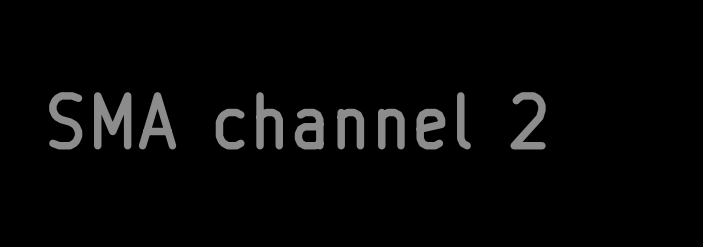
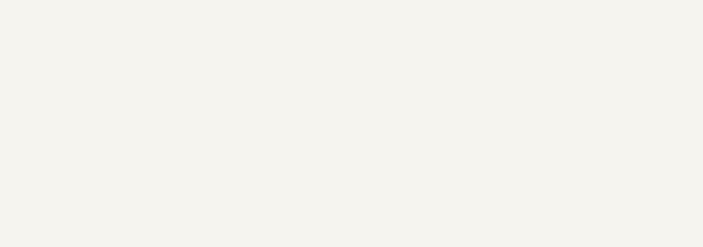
text: SMA channel 2 (297, 120) -> none

